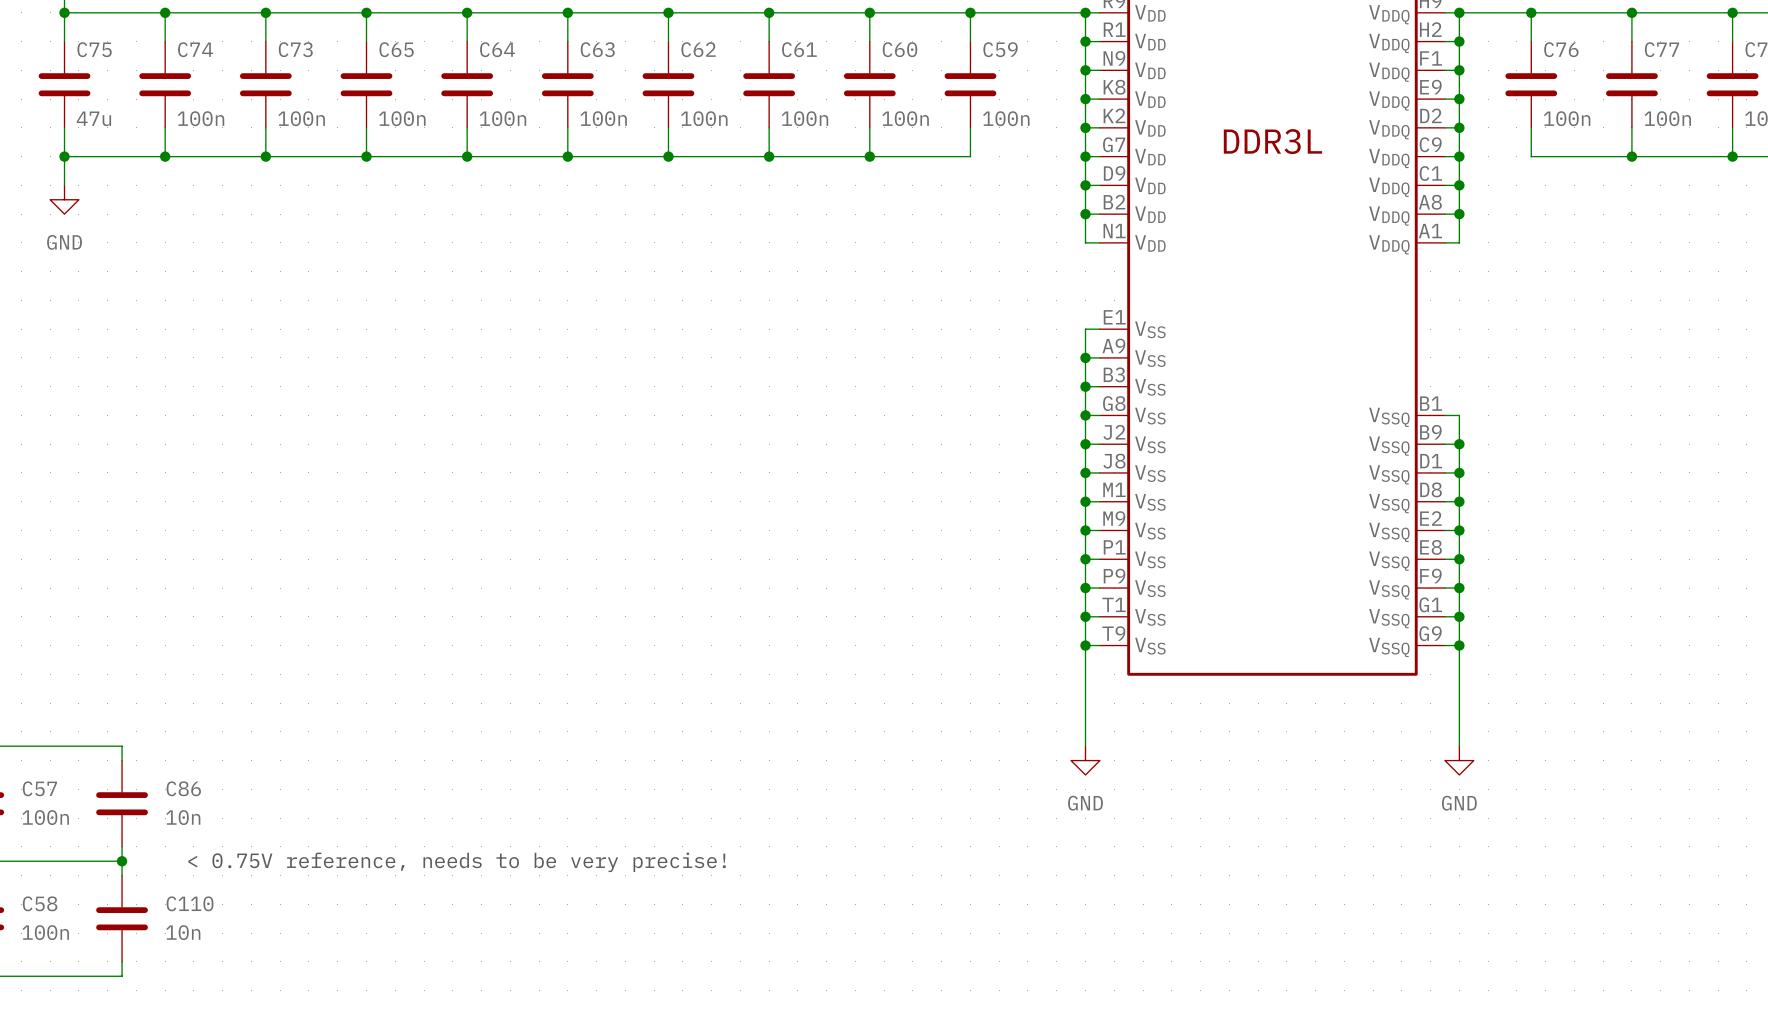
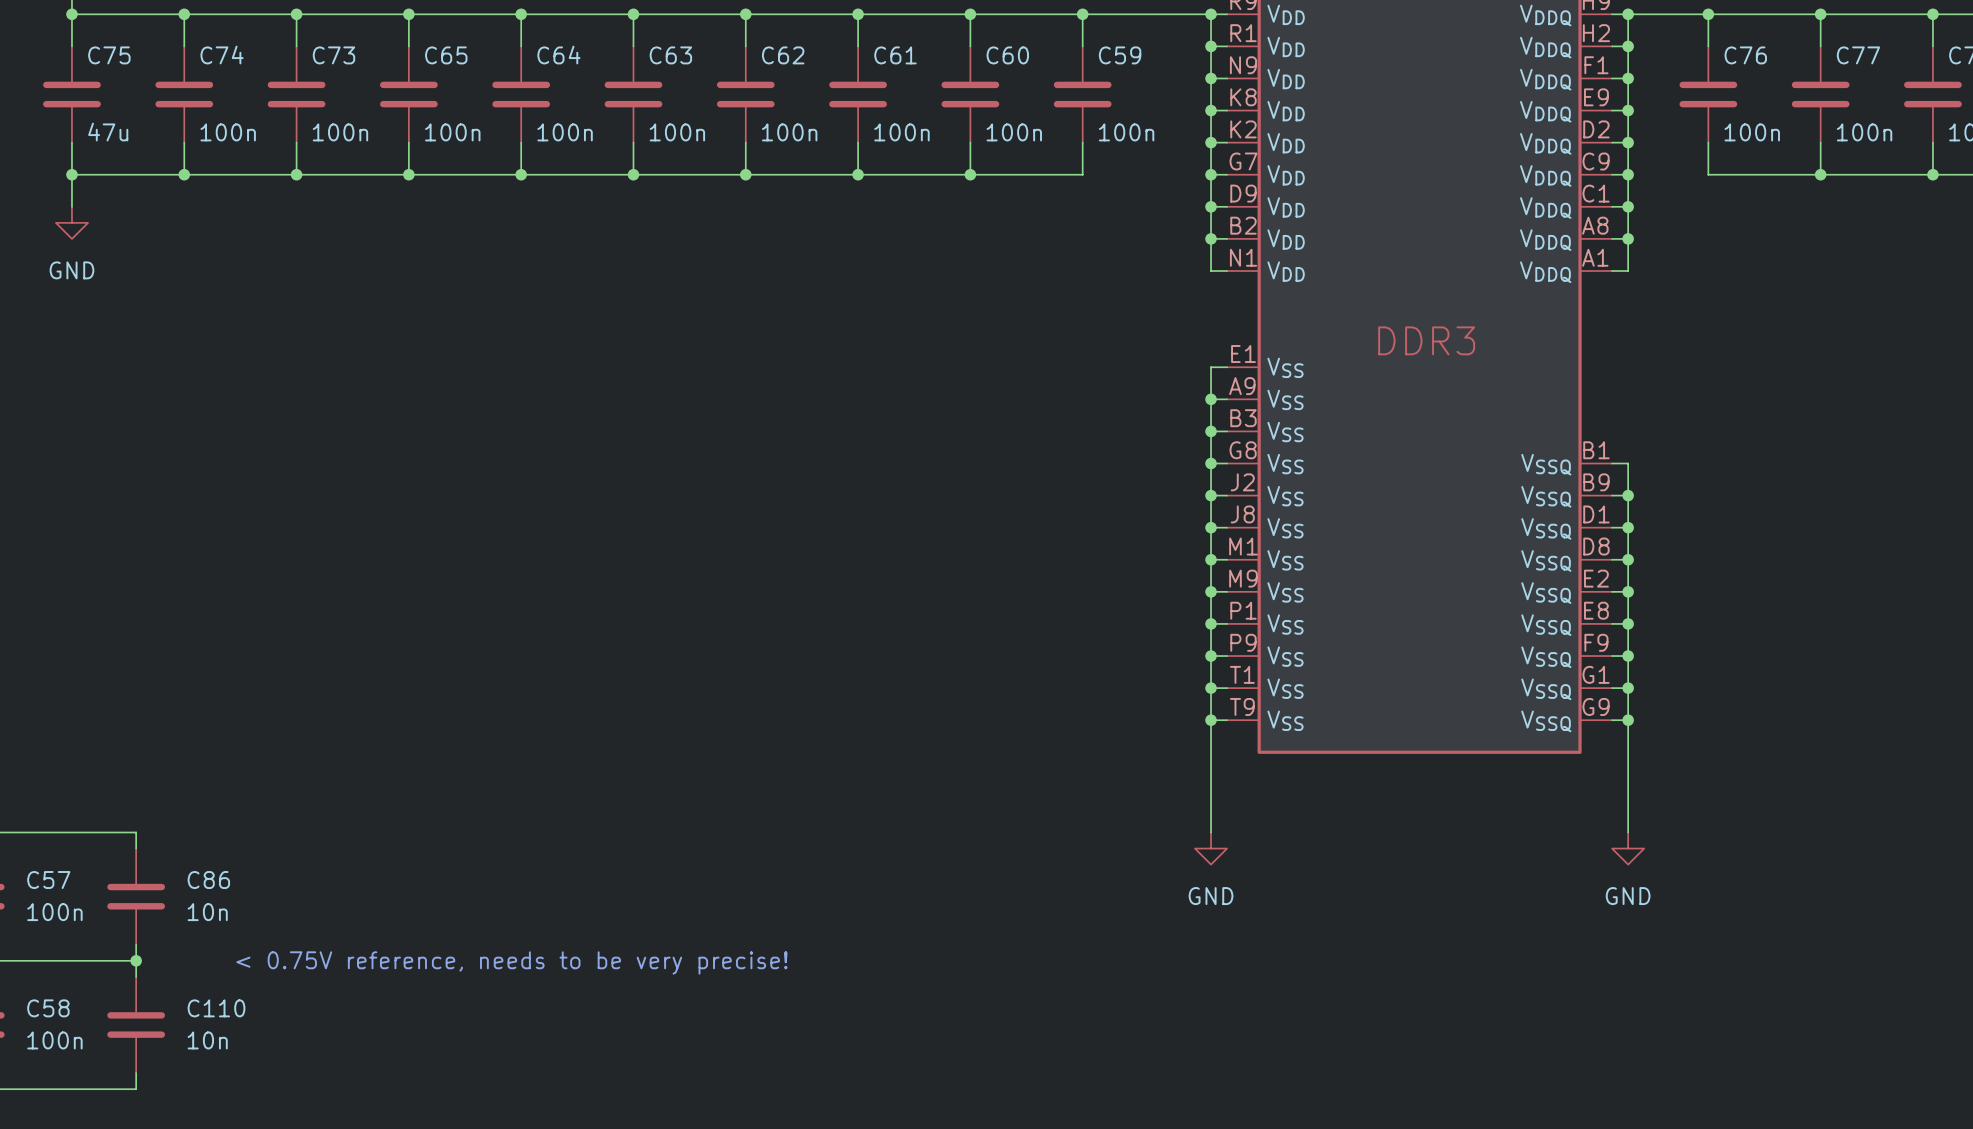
part text: DDR3L (1272, 141) -> none
part text: none -> DDR3 (1426, 340)

